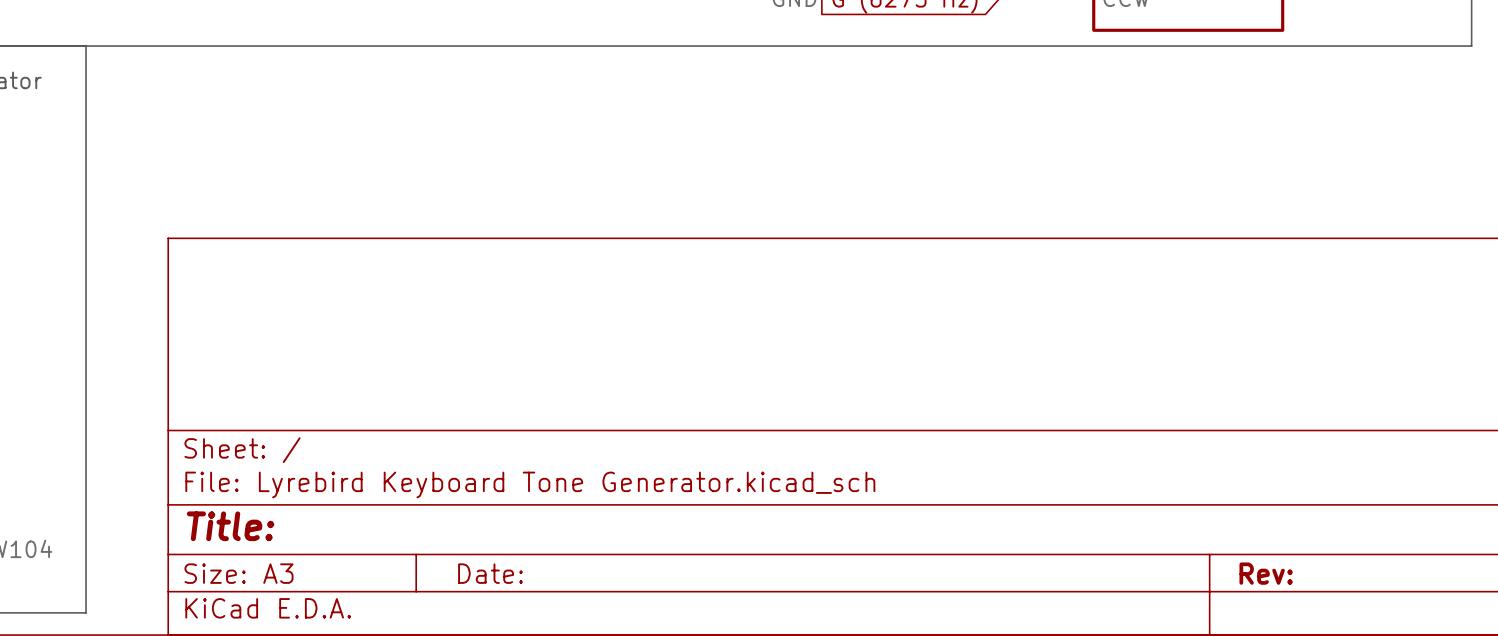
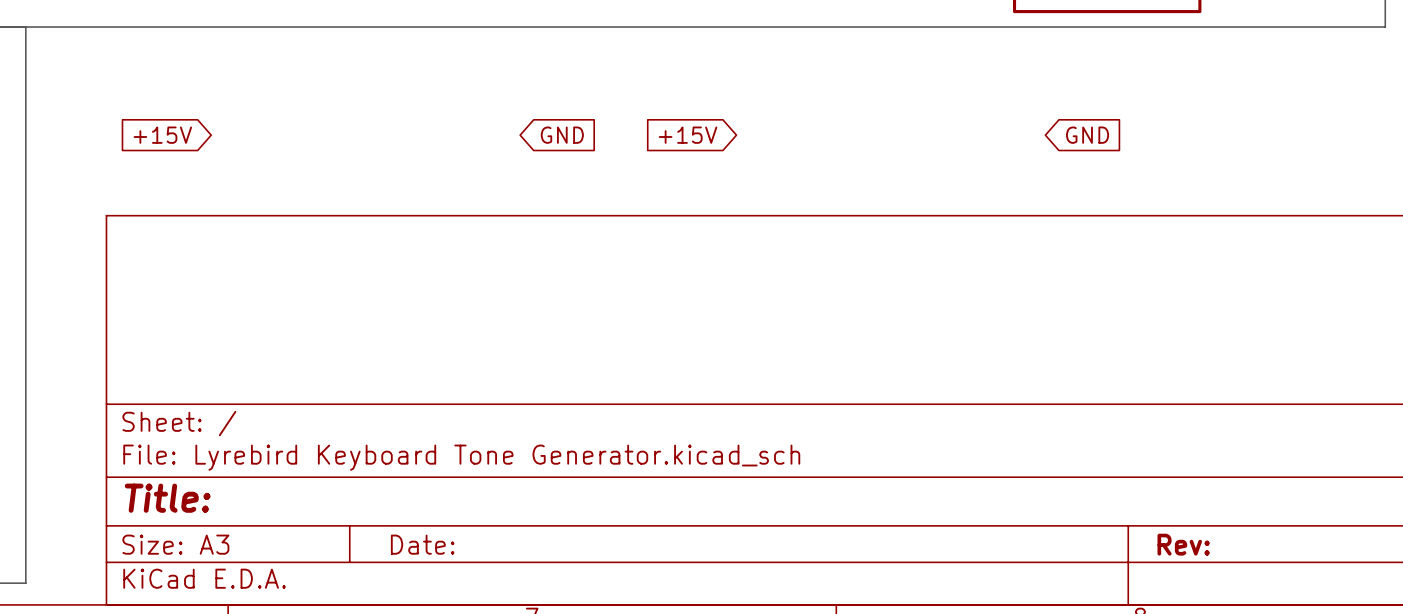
global label: none -> +15V (162, 135)
global label: none -> GND (562, 135)
global label: none -> +15V (688, 135)
global label: none -> GND (1087, 135)

